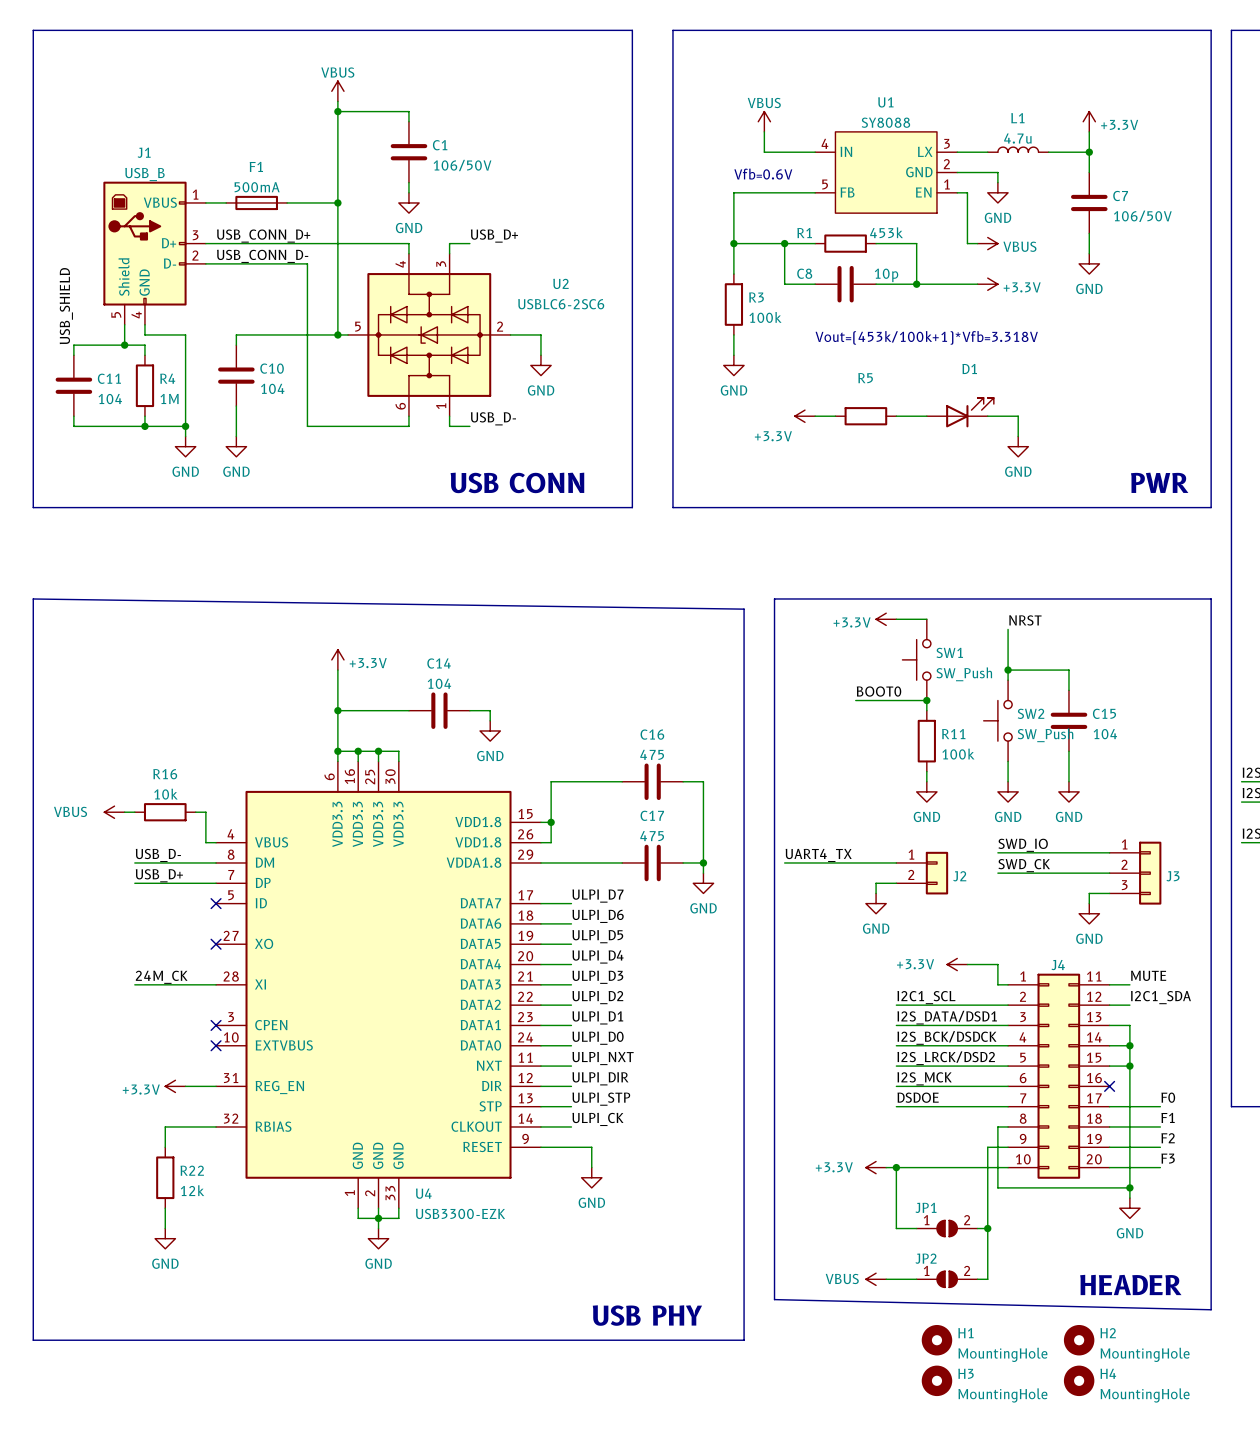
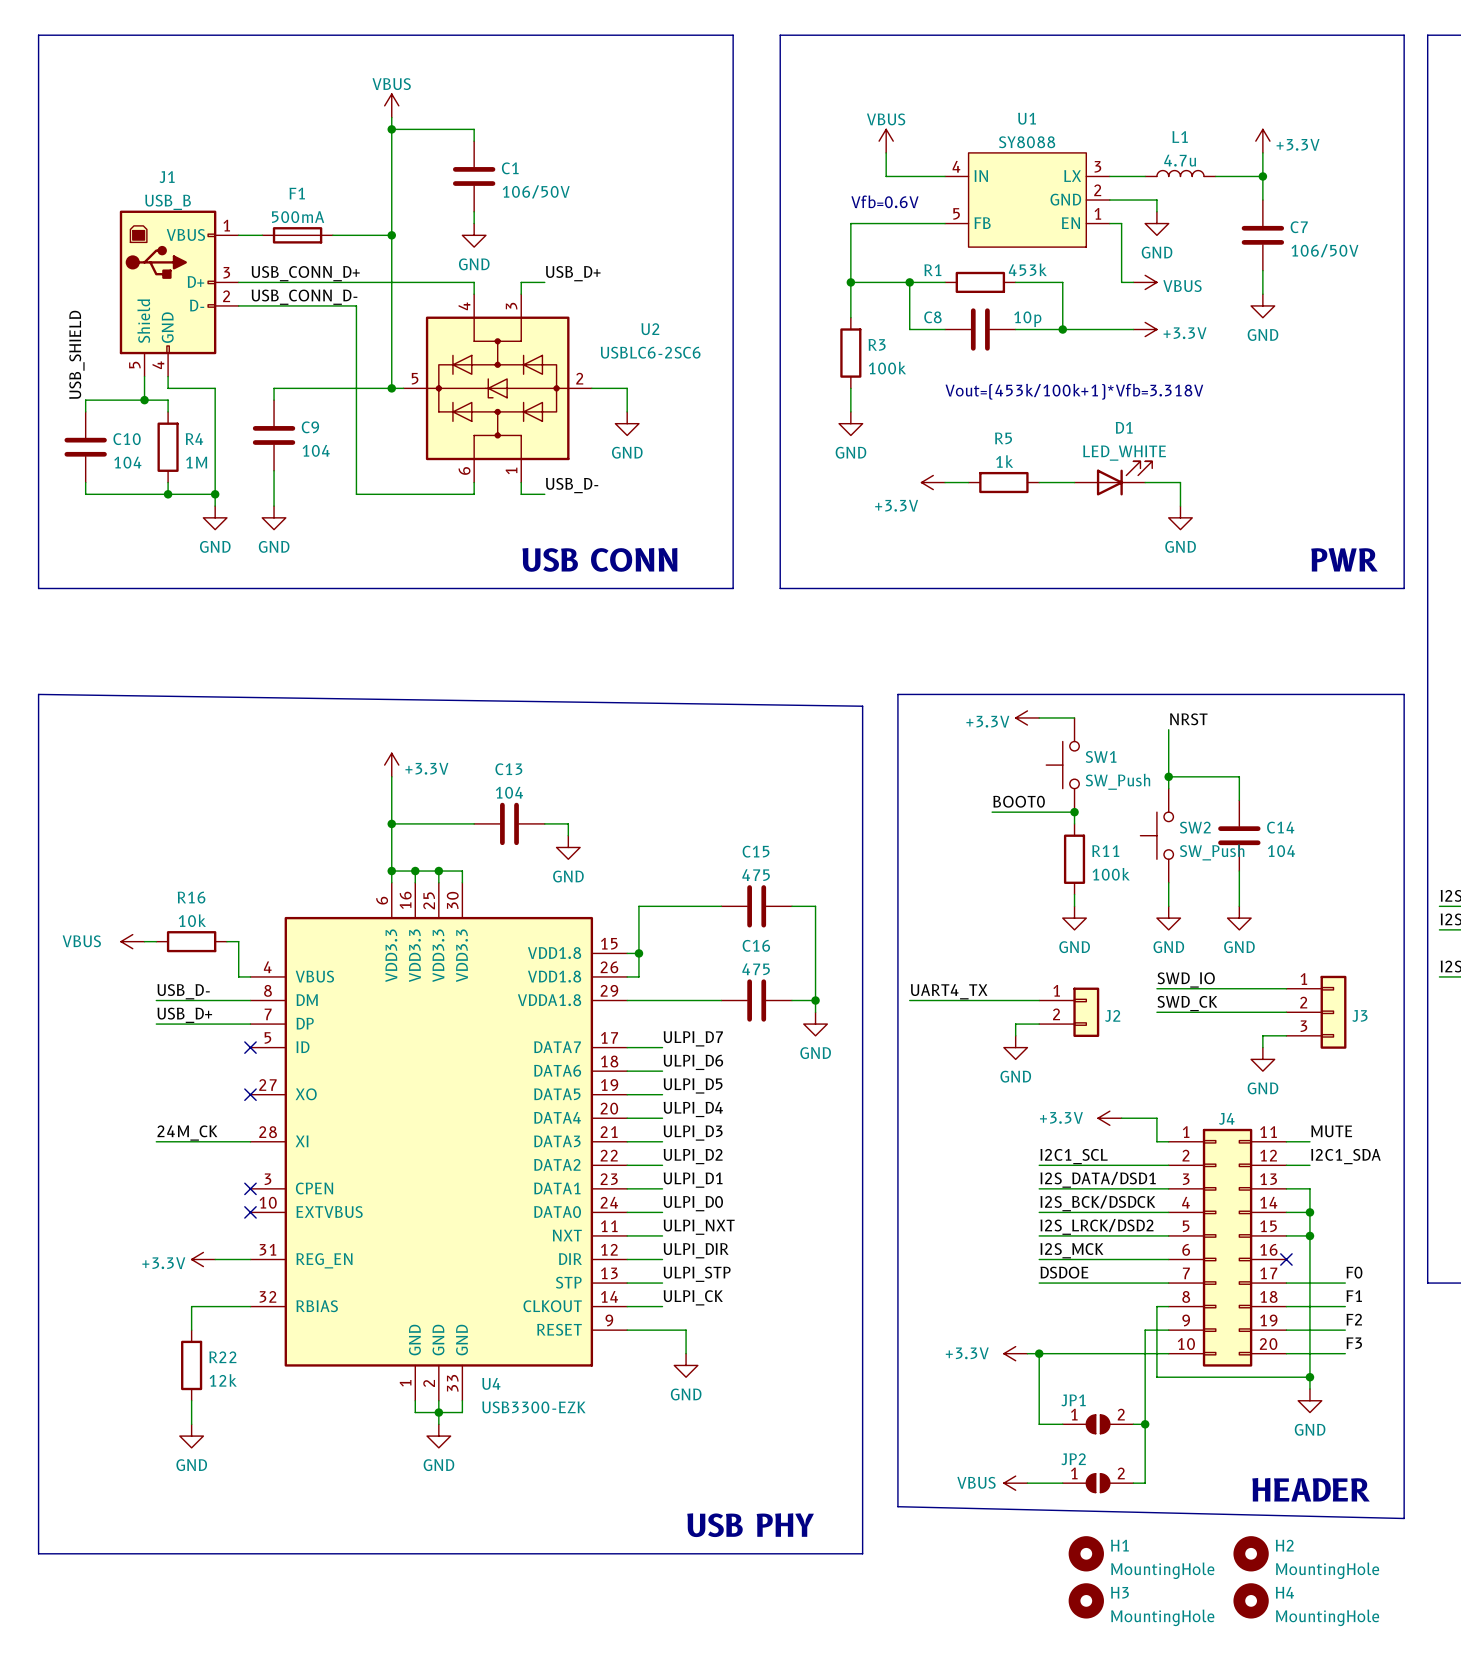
C10 name: C10 (272, 368) -> C9 (310, 427)
C11 name: C11 (109, 378) -> C10 (127, 439)
D1 value: none -> LED_WHITE (1124, 453)
R5 value: none -> 1k (1004, 461)
C14 name: C14 (439, 663) -> C13 (508, 769)
C15 name: C15 (1104, 713) -> C14 (1280, 827)
C16 name: C16 (652, 734) -> C15 (756, 851)
C17 name: C17 (652, 815) -> C16 (756, 945)

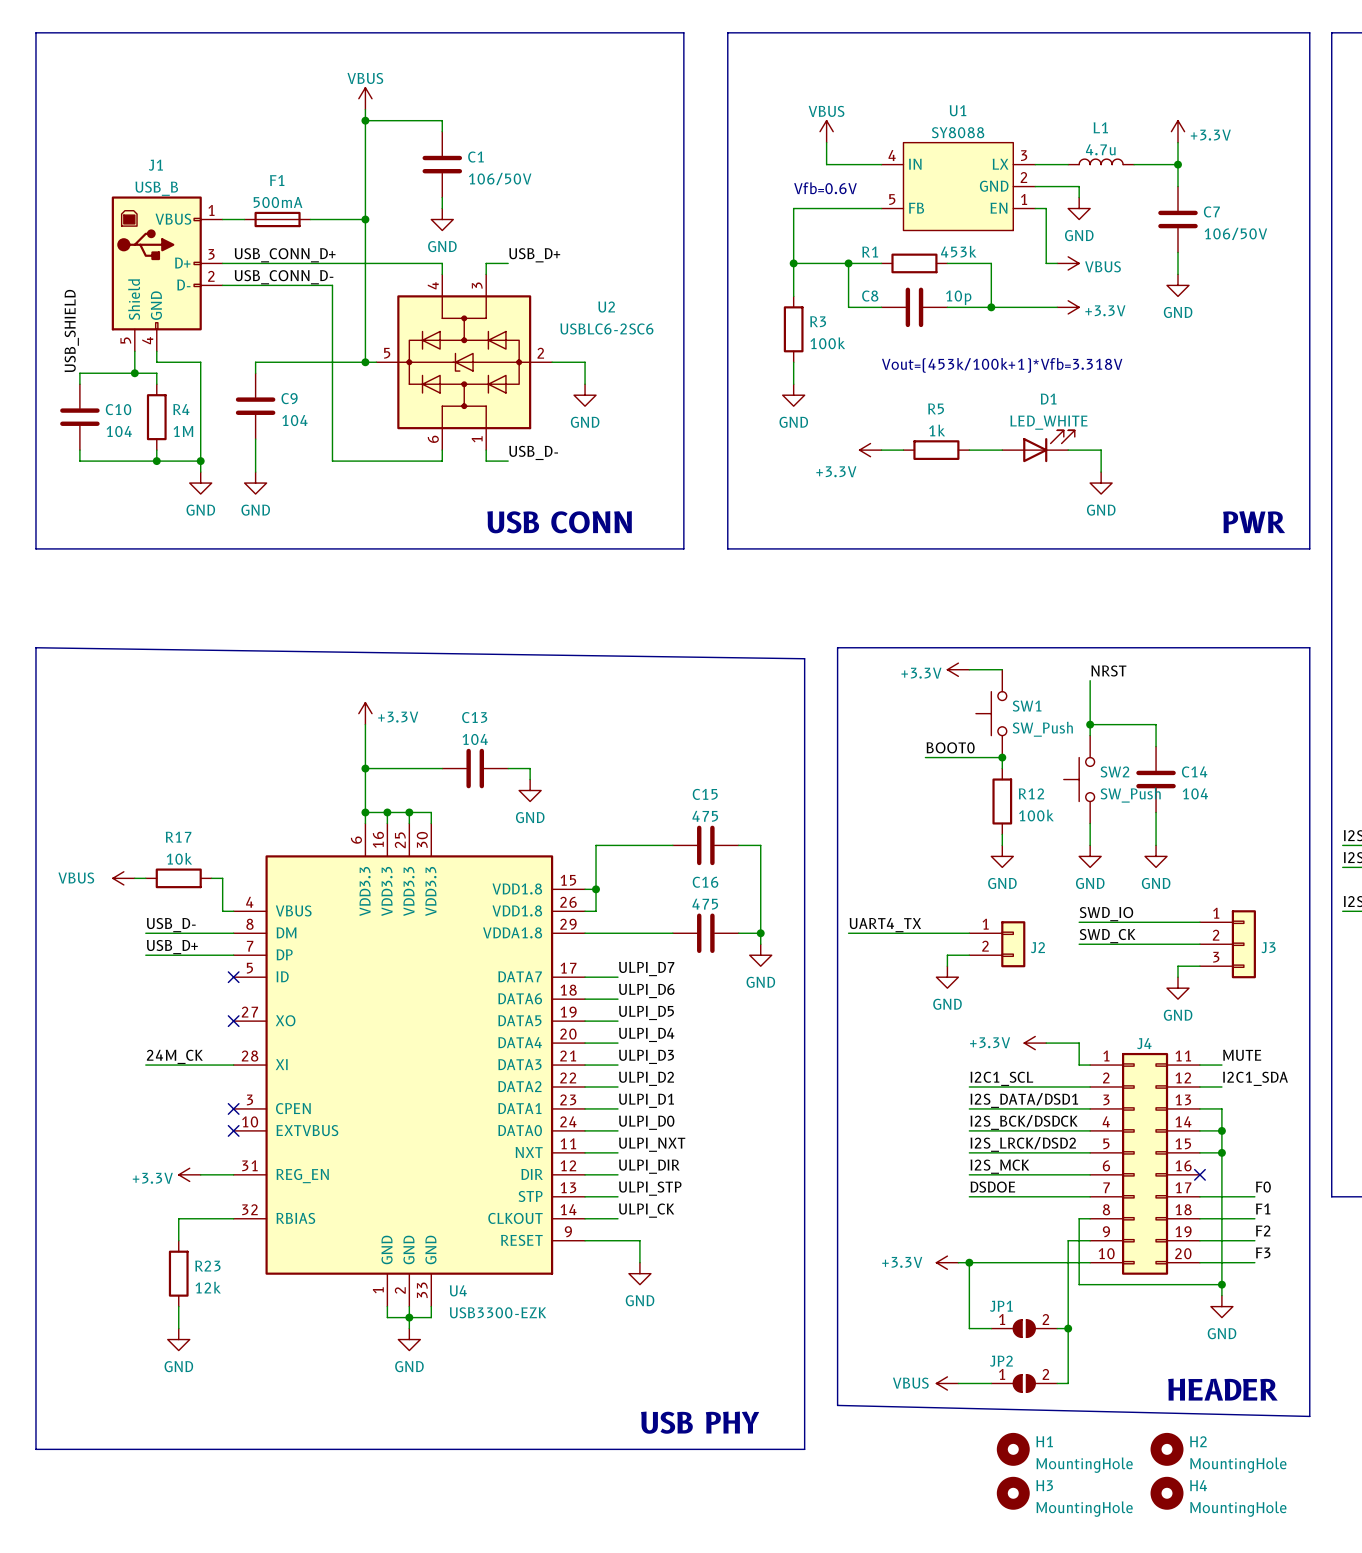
R11 name: R11 (1105, 851) -> R12 (1031, 793)
R16 name: R16 (191, 897) -> R17 (178, 837)
R22 name: R22 (222, 1357) -> R23 (207, 1266)

